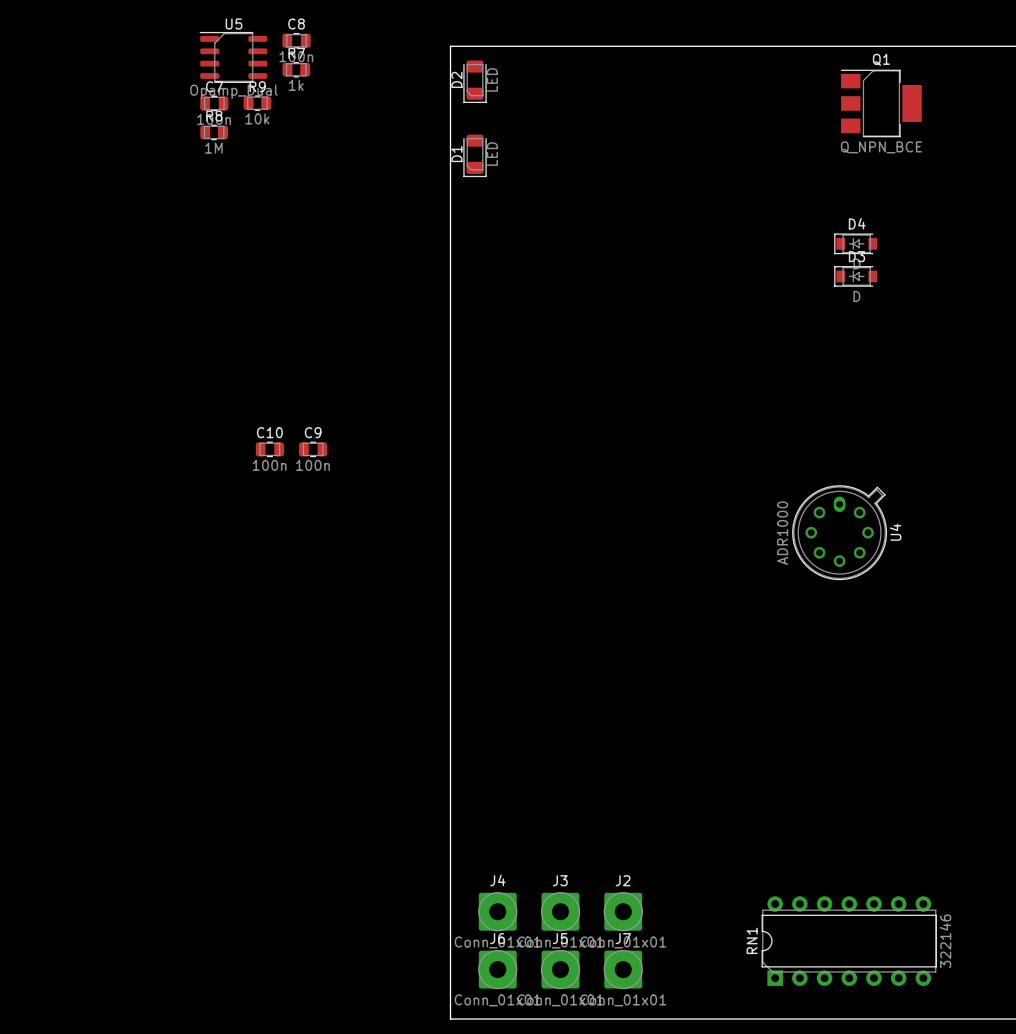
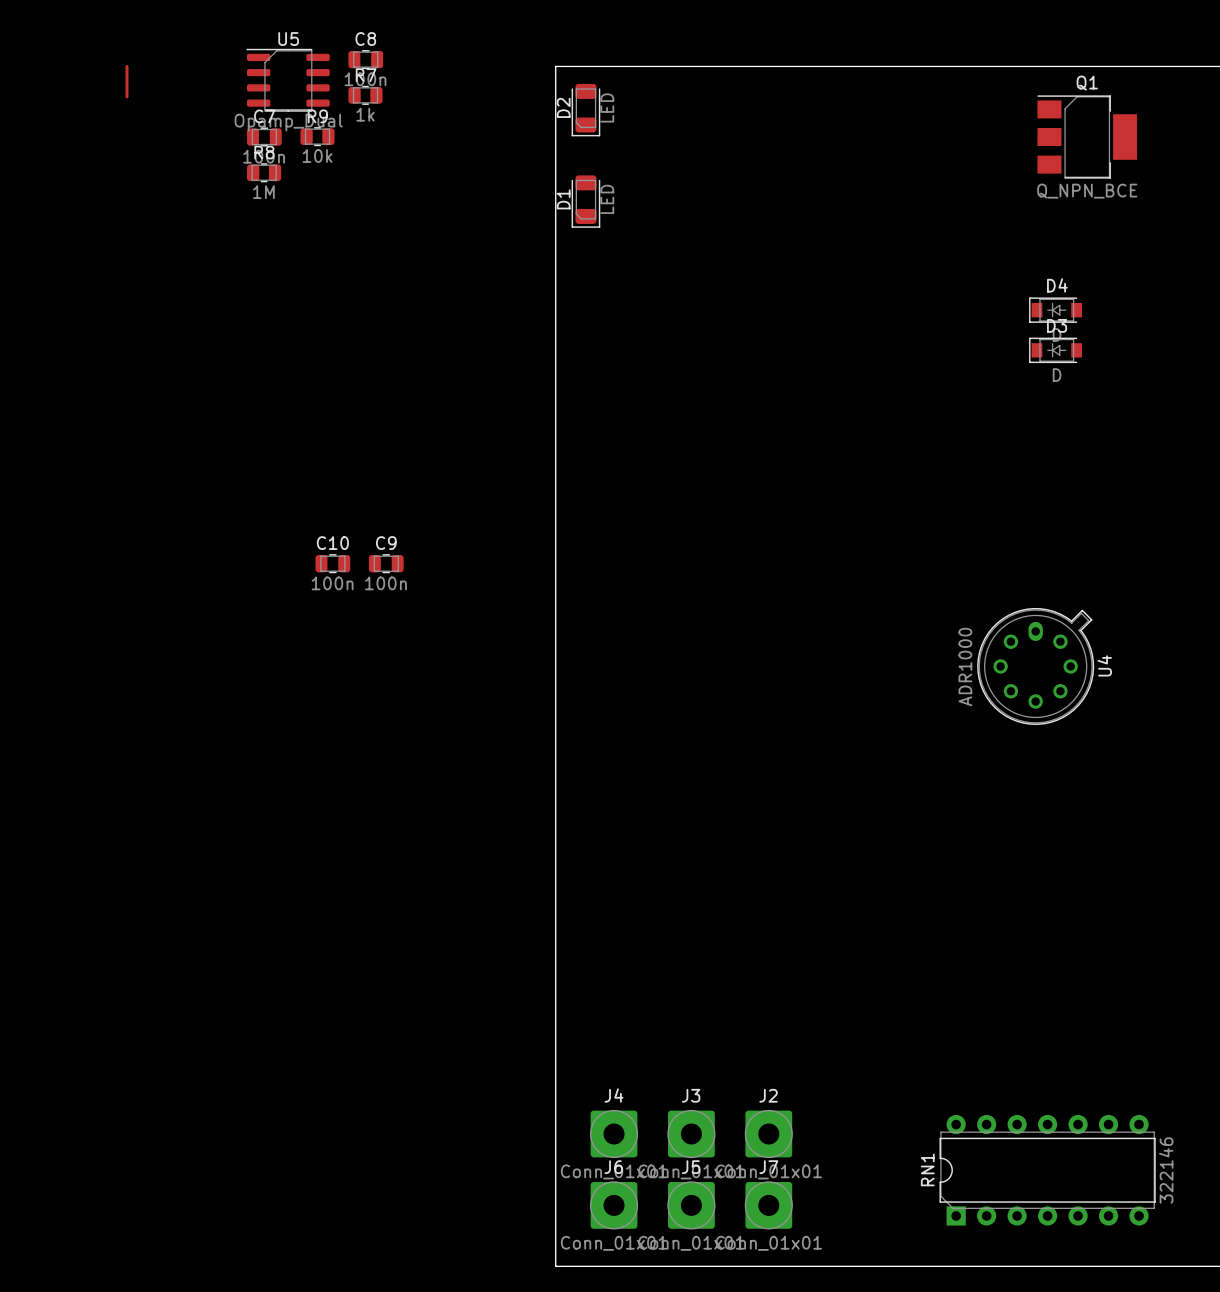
top track: none -> (126, 66) (126, 96)

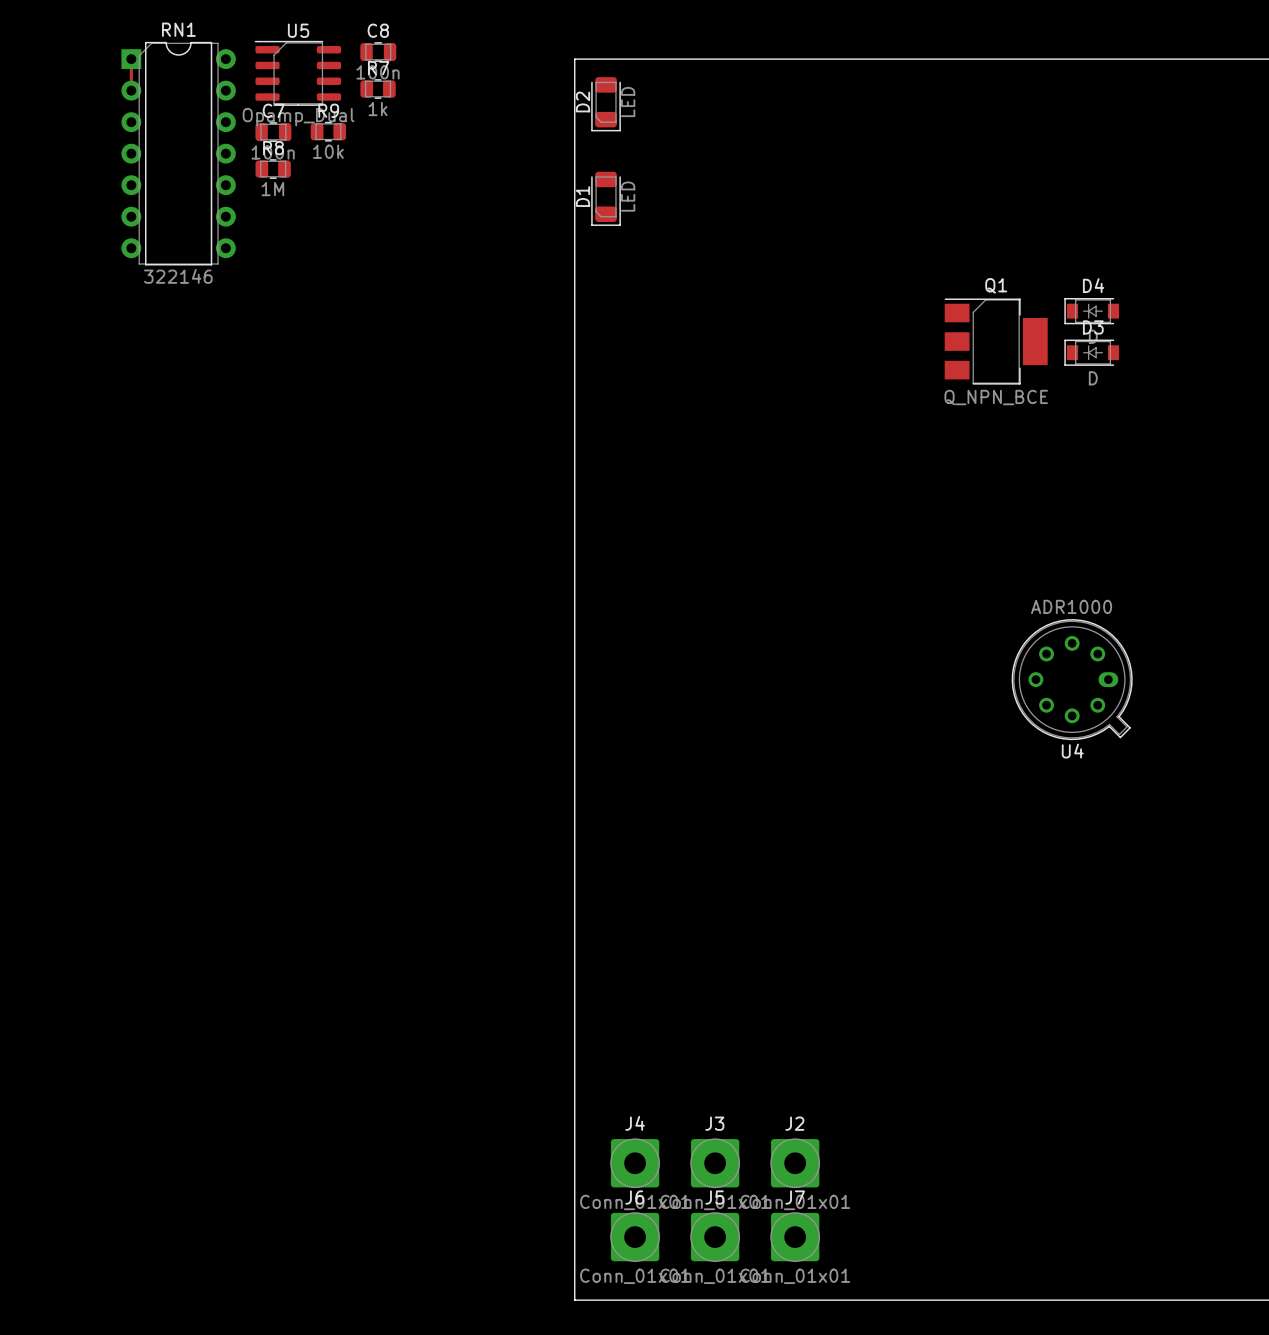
Q1 position: (1087, 137) -> (996, 341)
C10: 100n (332, 563) -> none
C9: 100n (386, 563) -> none
U4 rotation: 0° (1035, 666) -> 90° clockwise (1072, 679)
RN1 rotation: 0° (1047, 1170) -> 90° clockwise (178, 153)
RN1 position: (1047, 1170) -> (178, 153)

